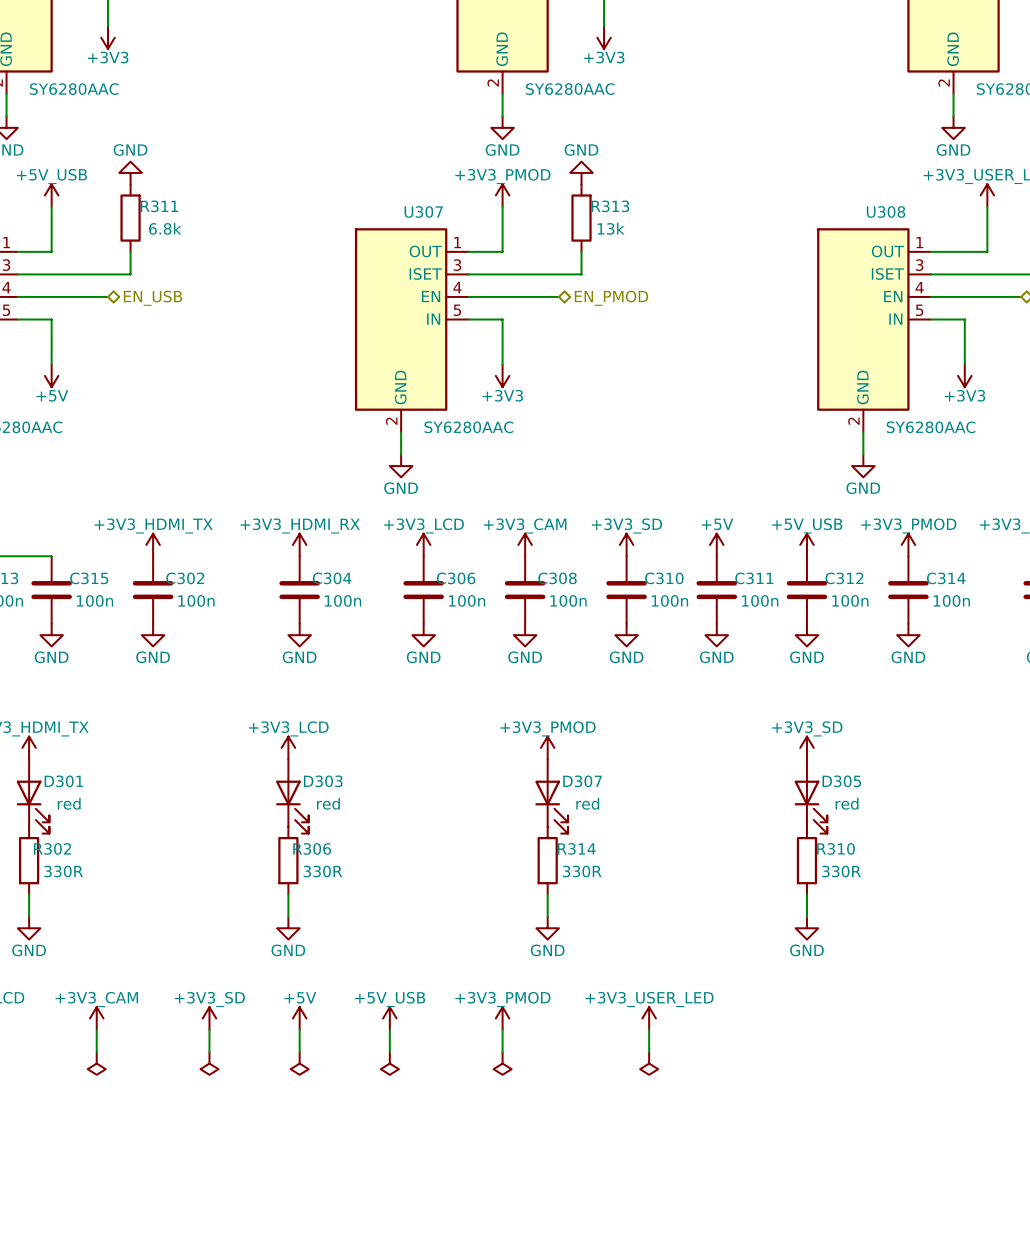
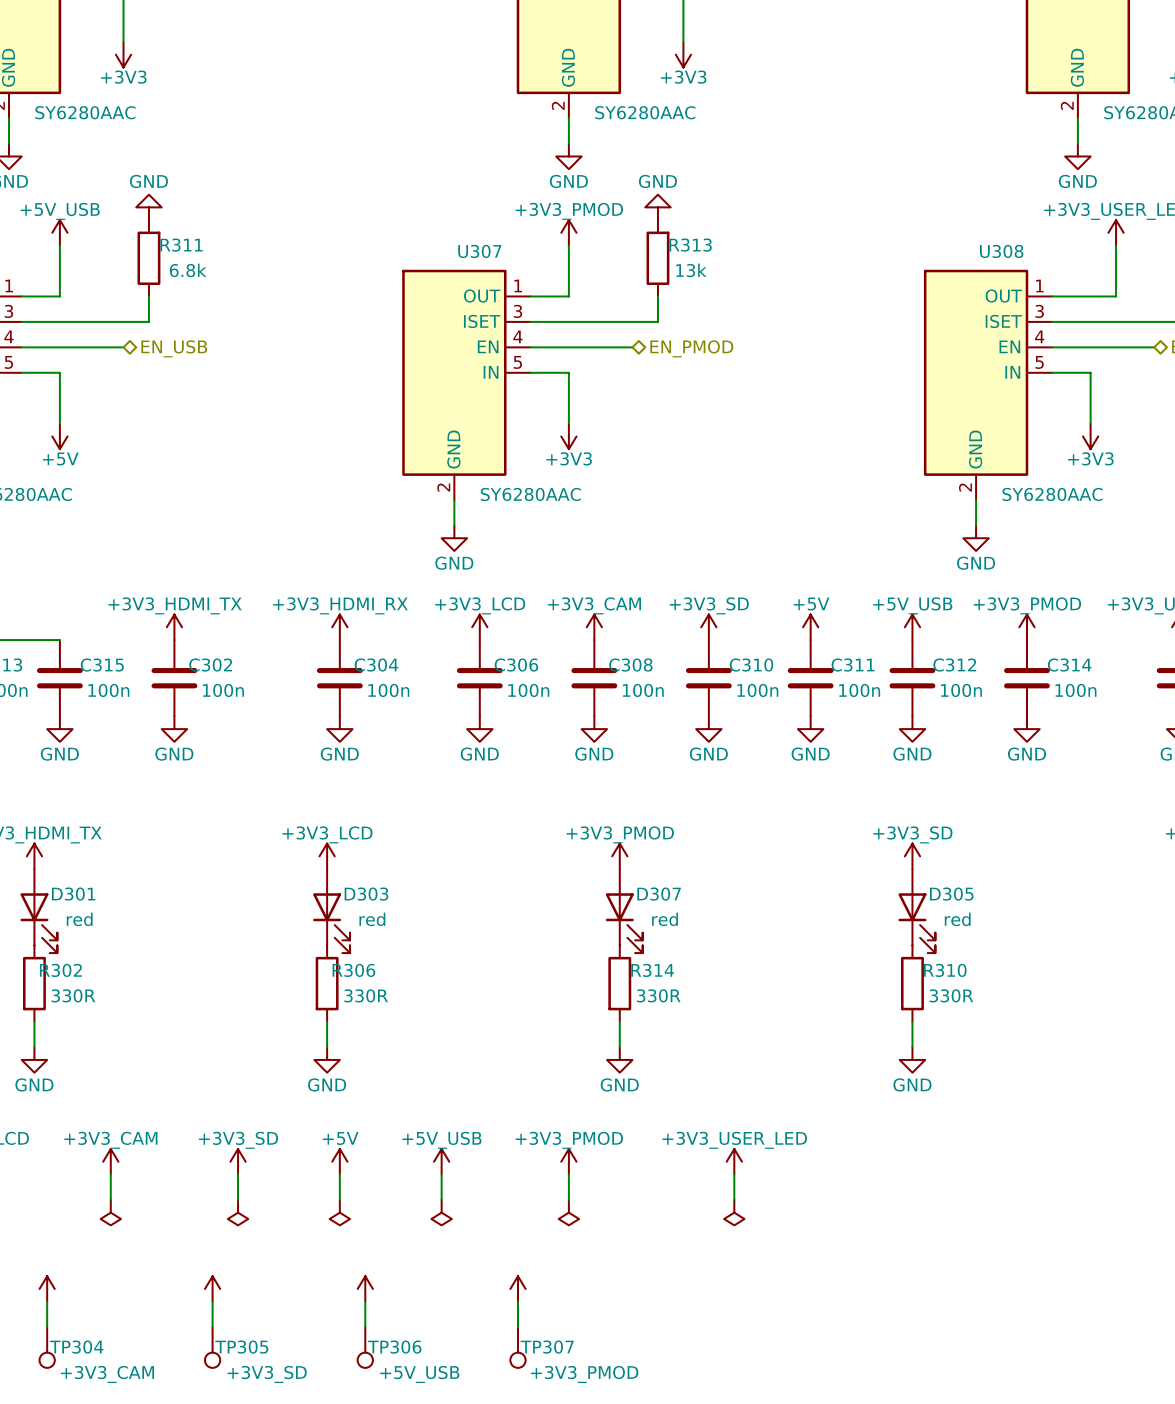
power symbol: none -> (47, 1289)
power symbol: none -> (212, 1289)
power symbol: none -> (365, 1289)
power symbol: none -> (517, 1289)
wire: none -> (47, 1301) (47, 1327)
wire: none -> (212, 1301) (212, 1327)
wire: none -> (365, 1301) (365, 1327)
wire: none -> (517, 1301) (517, 1327)
TP304: none -> +3V3_CAM (47, 1347)
TP305: none -> +3V3_SD (212, 1347)
TP306: none -> +5V_USB (365, 1347)
TP307: none -> +3V3_PMOD (517, 1347)

